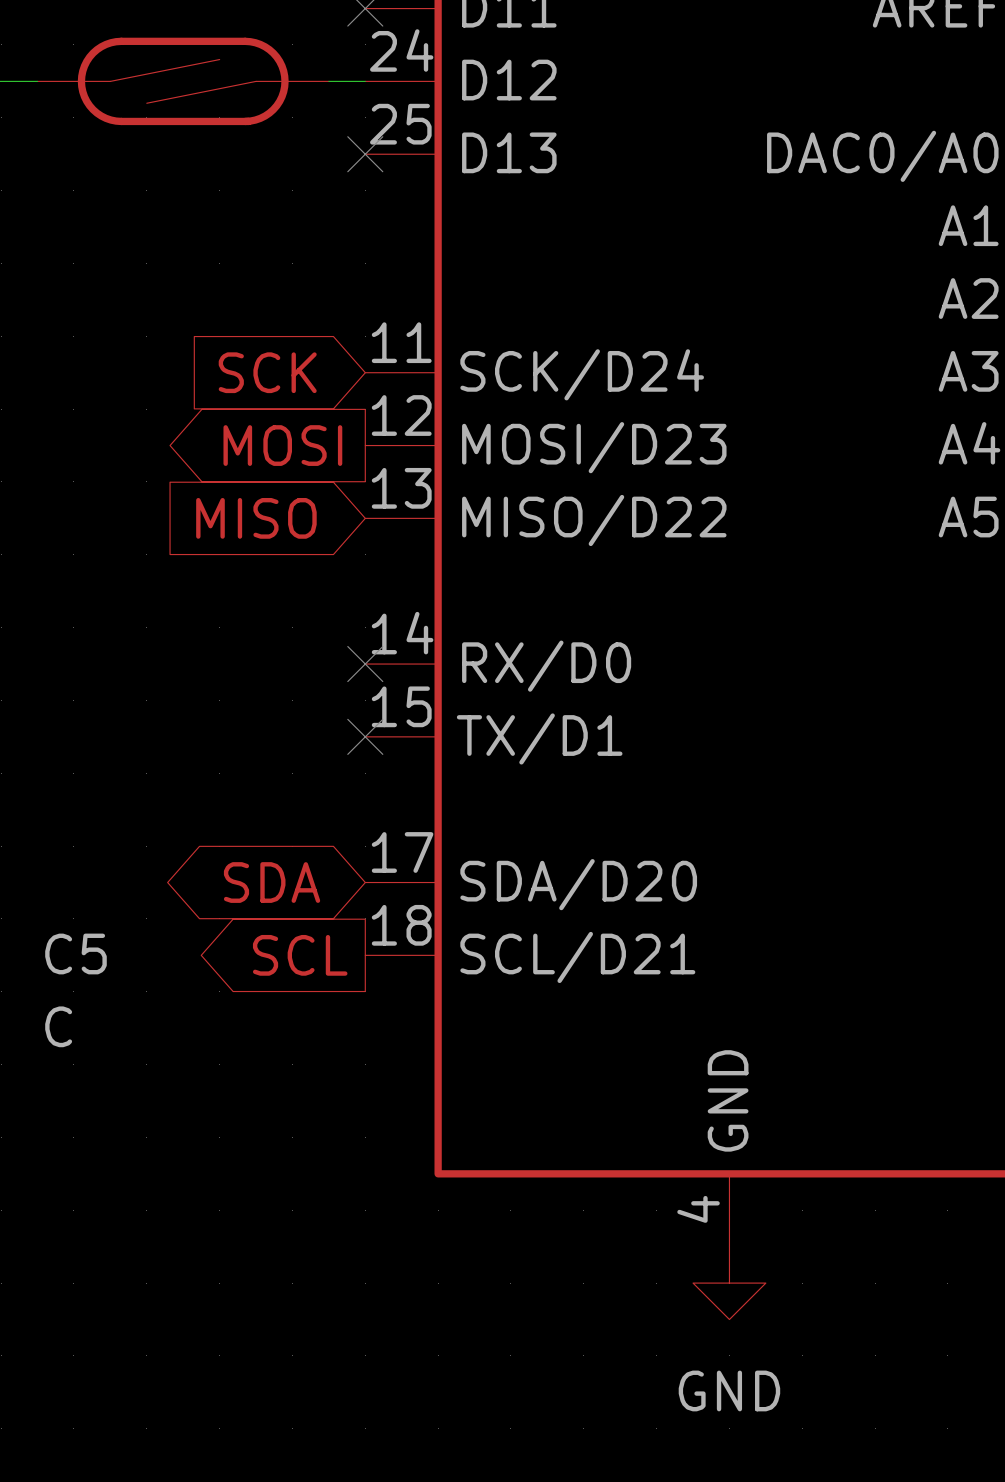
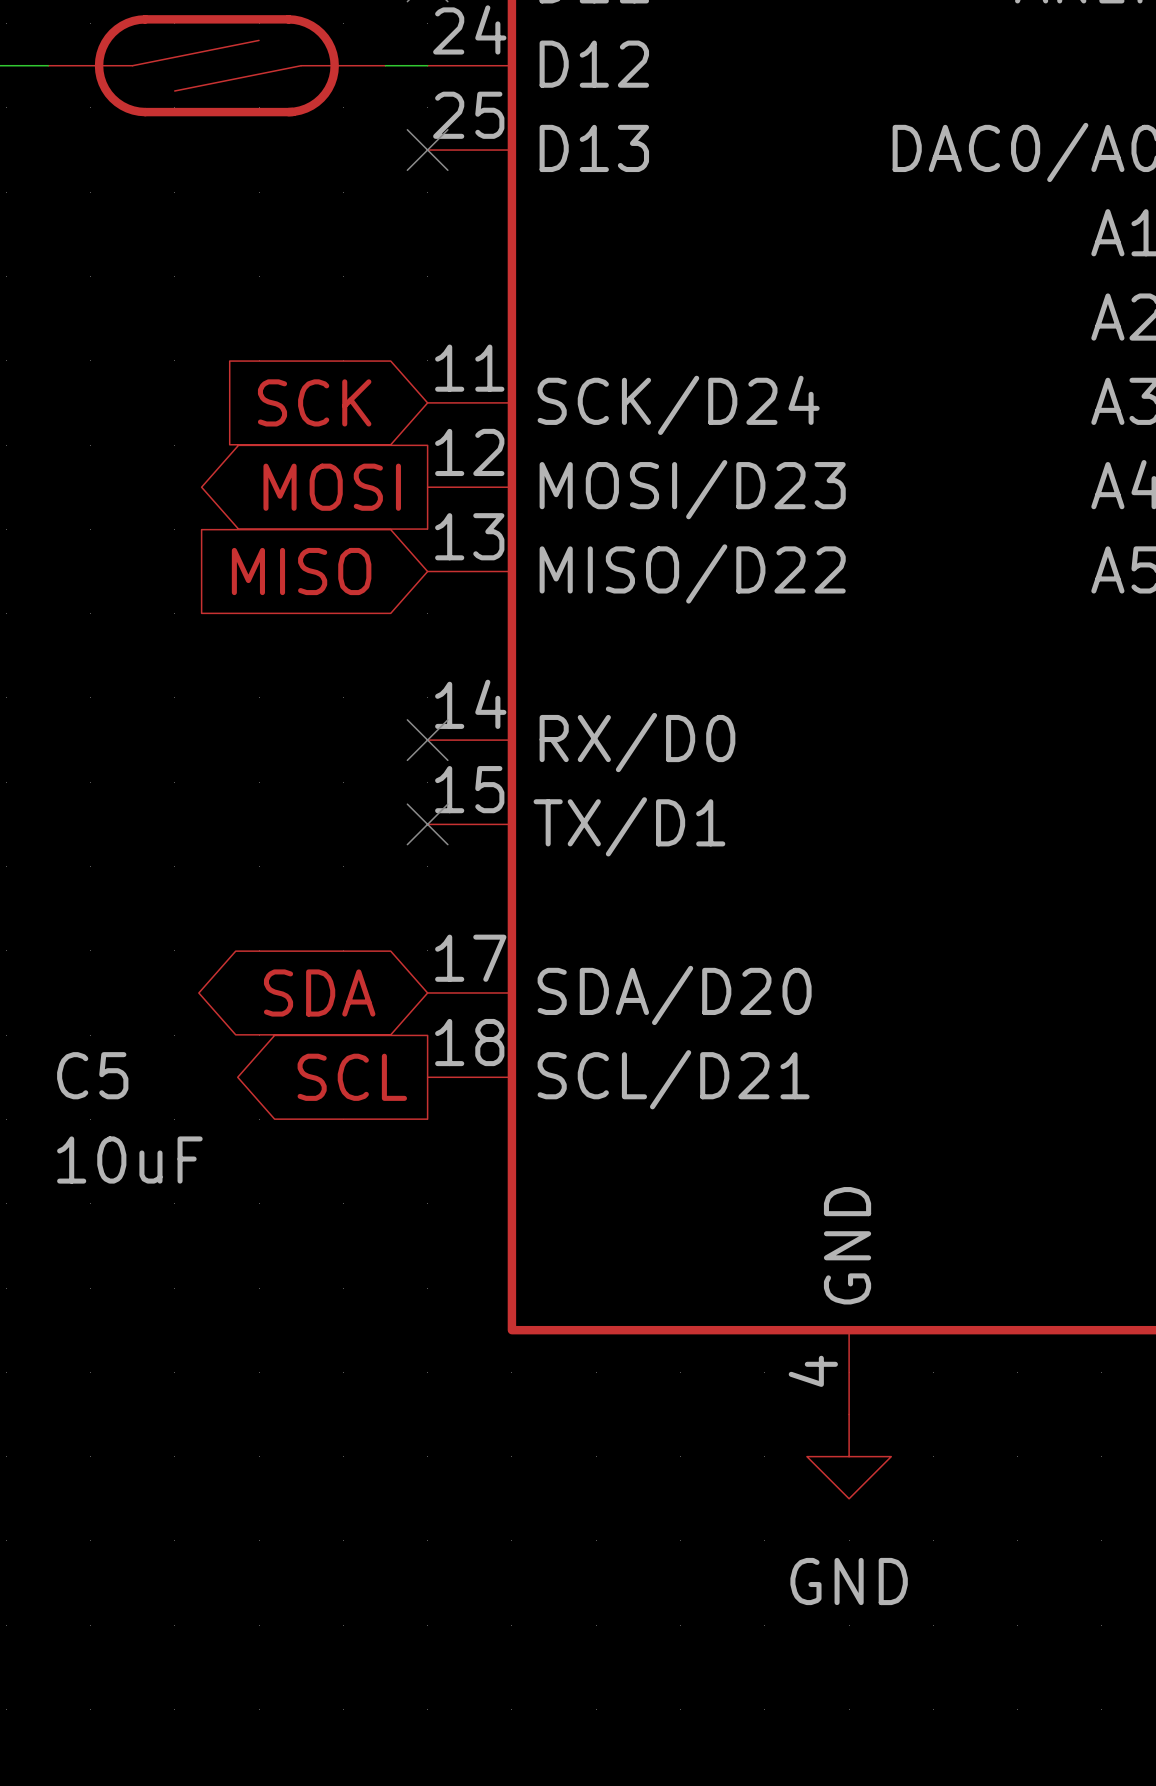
C5 value: C (58, 1026) -> 10uF (129, 1160)

